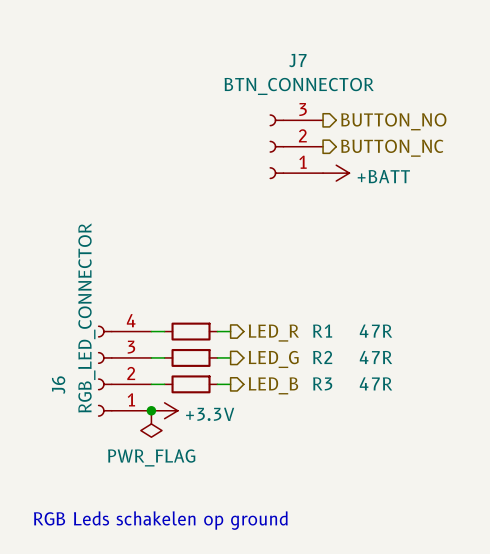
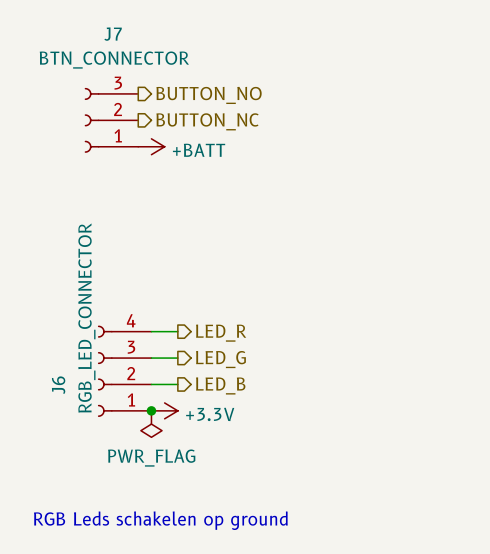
hierarchical label position: BUTTON_NO (393, 121) -> BUTTON_NO (209, 95)
J7 position: (296, 146) -> (111, 120)
hierarchical label position: BUTTON_NC (392, 148) -> BUTTON_NC (207, 121)
power symbol position: +BATT (336, 173) -> +BATT (151, 146)
R1: 47R (191, 331) -> none
hierarchical label position: LED_R (273, 333) -> LED_R (221, 333)
R2: 47R (191, 357) -> none
hierarchical label position: LED_G (273, 359) -> LED_G (220, 359)
R3: 47R (191, 384) -> none
hierarchical label position: LED_B (273, 385) -> LED_B (220, 385)

